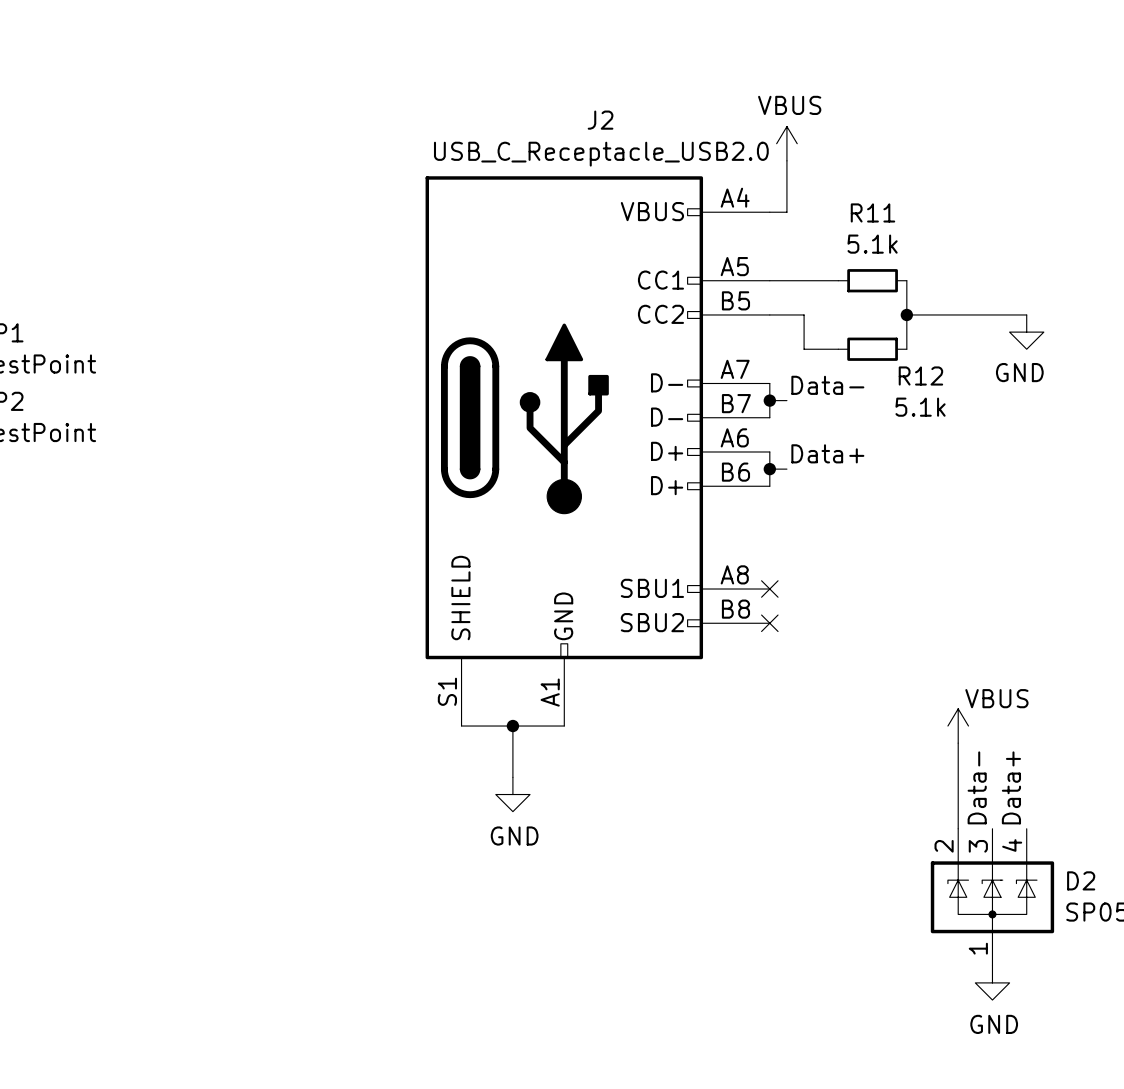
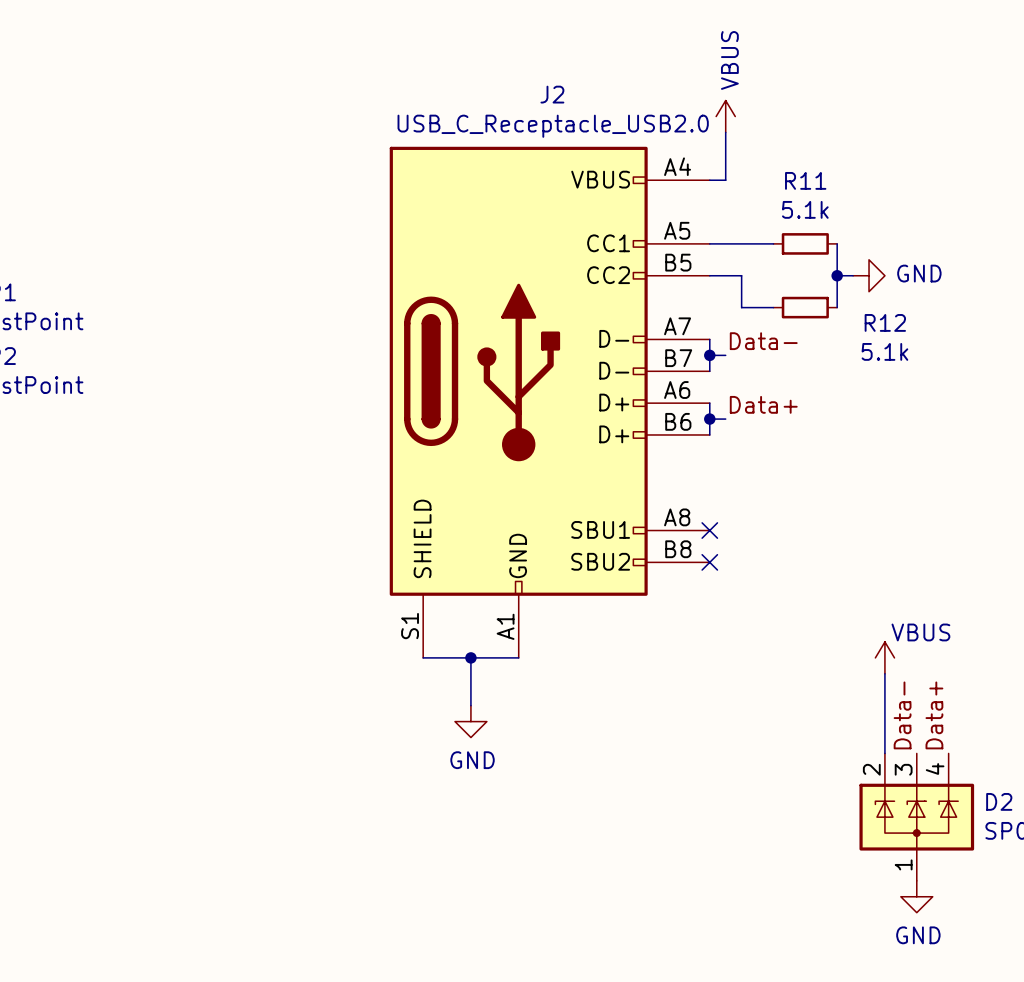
power symbol text rotation: 0° (789, 105) -> 90° counterclockwise (729, 60)
wire: (923, 314) (1026, 314) -> none
power symbol rotation: 0° (1026, 332) -> 90° counterclockwise (869, 275)
power symbol position: GND (1026, 332) -> GND (869, 275)
R12 name position: R12 (920, 375) -> R12 (885, 322)
R12 value position: 5.1k (920, 407) -> 5.1k (884, 351)

